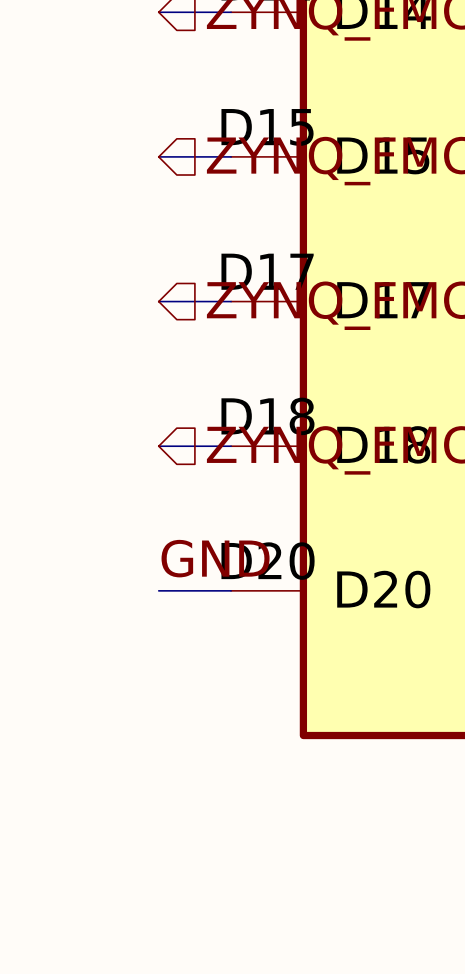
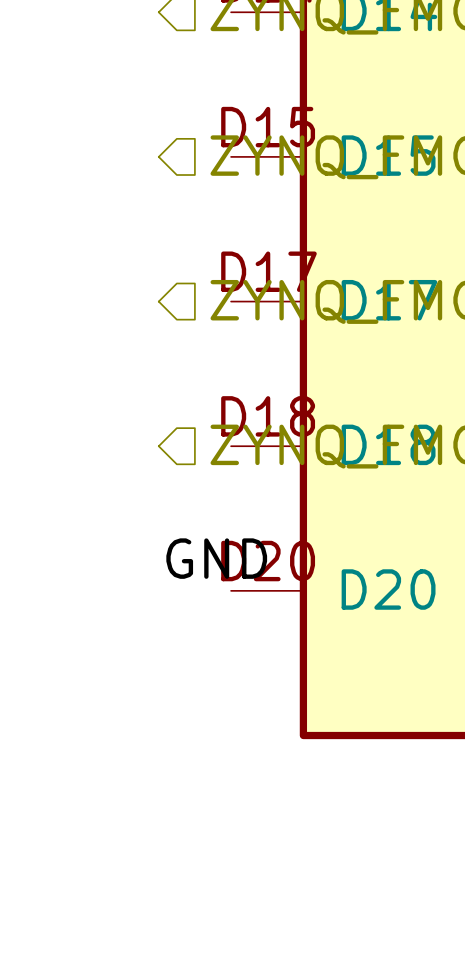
wire: (158, 12) (231, 12) -> none
wire: (158, 156) (231, 156) -> none
wire: (158, 301) (231, 301) -> none
wire: (158, 446) (231, 446) -> none
wire: (158, 590) (231, 590) -> none

